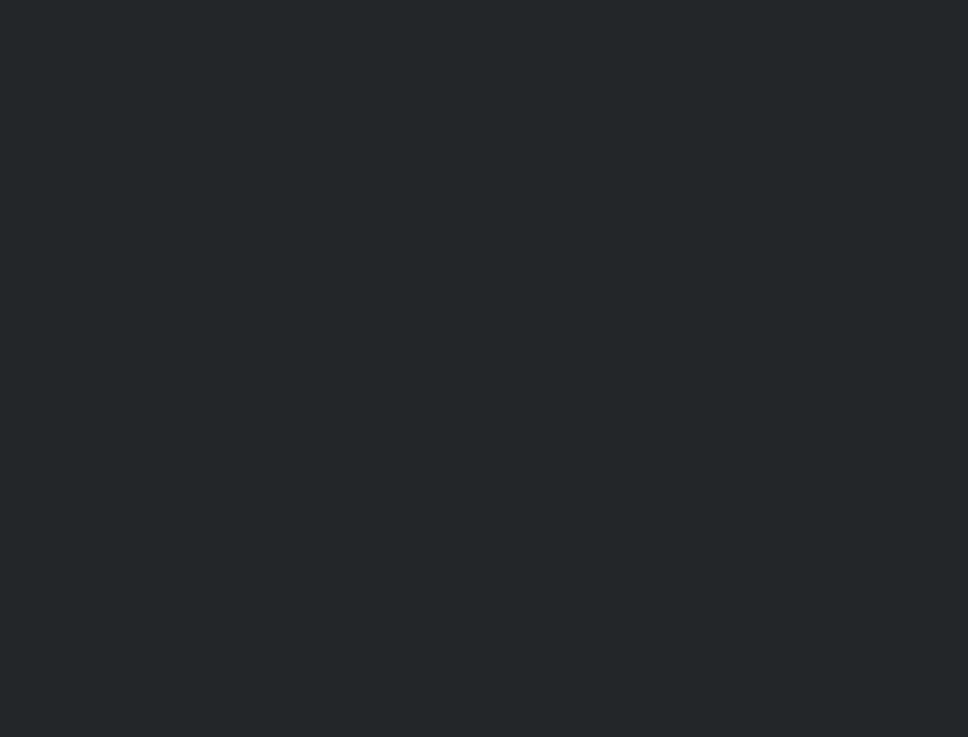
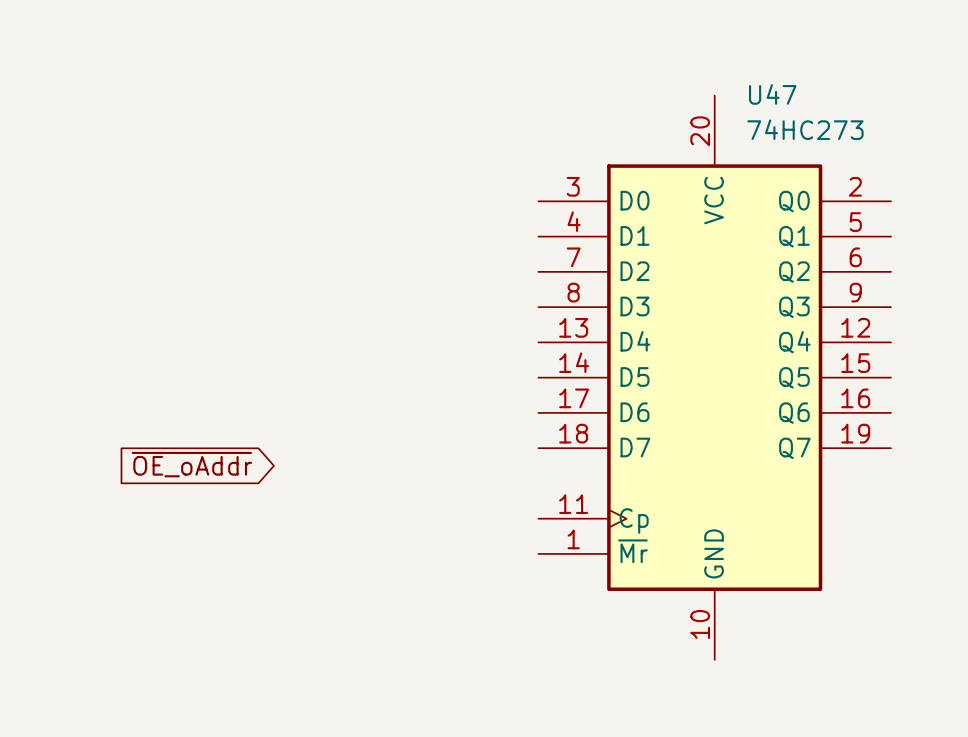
U47: none -> 74HC273 (714, 377)
global label: none -> ~{OE_oAddr} (191, 464)

